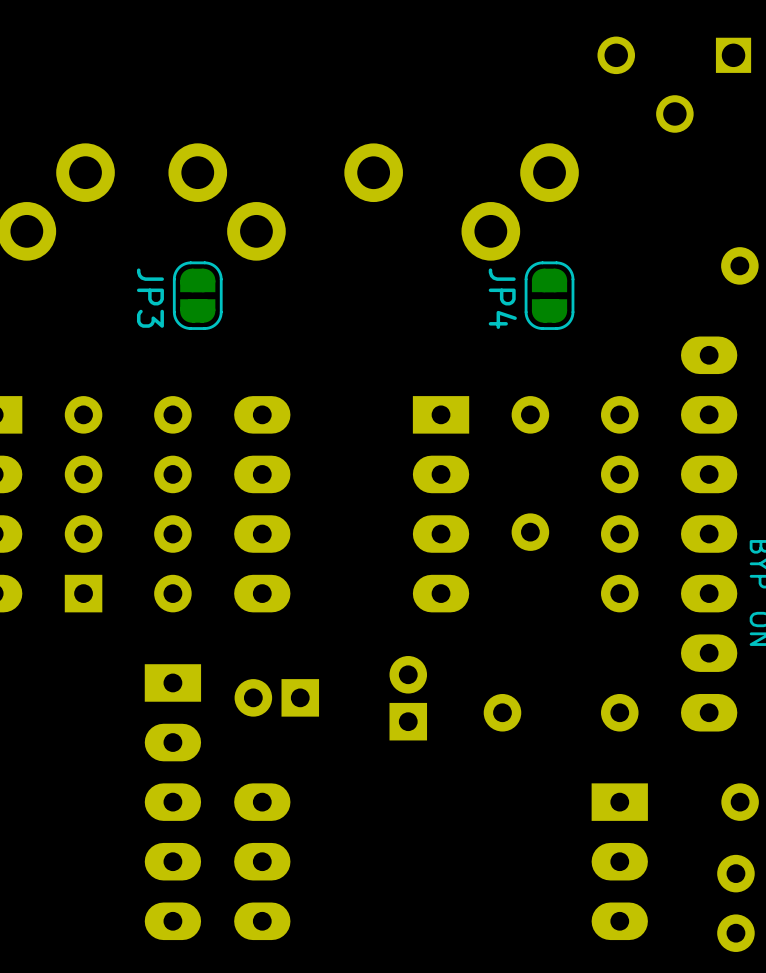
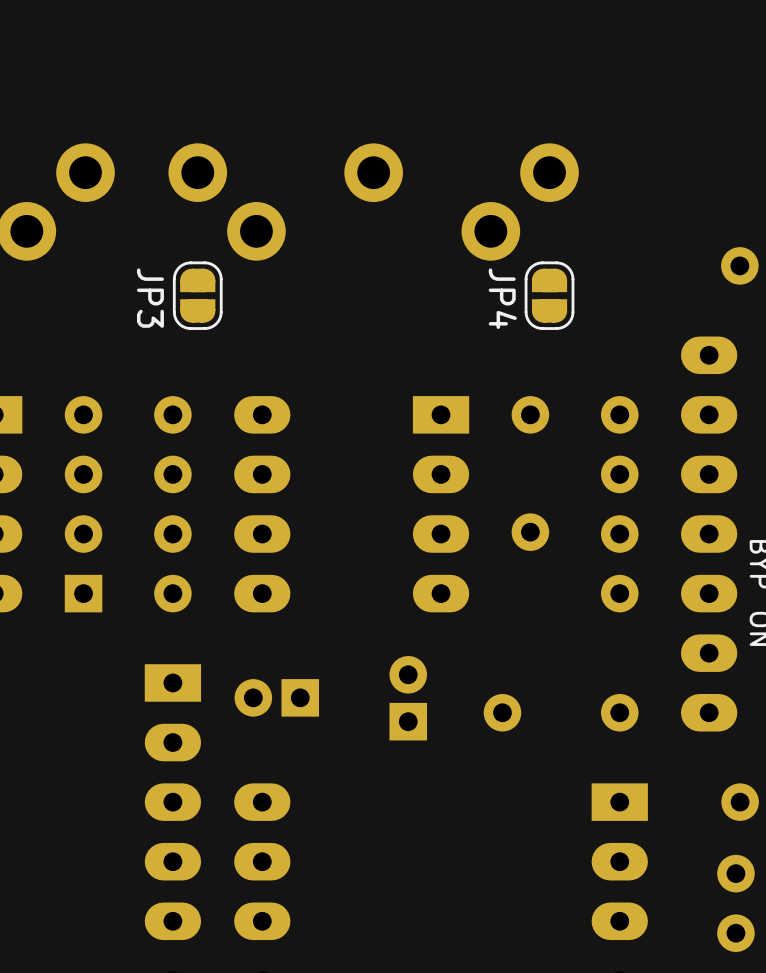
part: (674, 84) -> none

